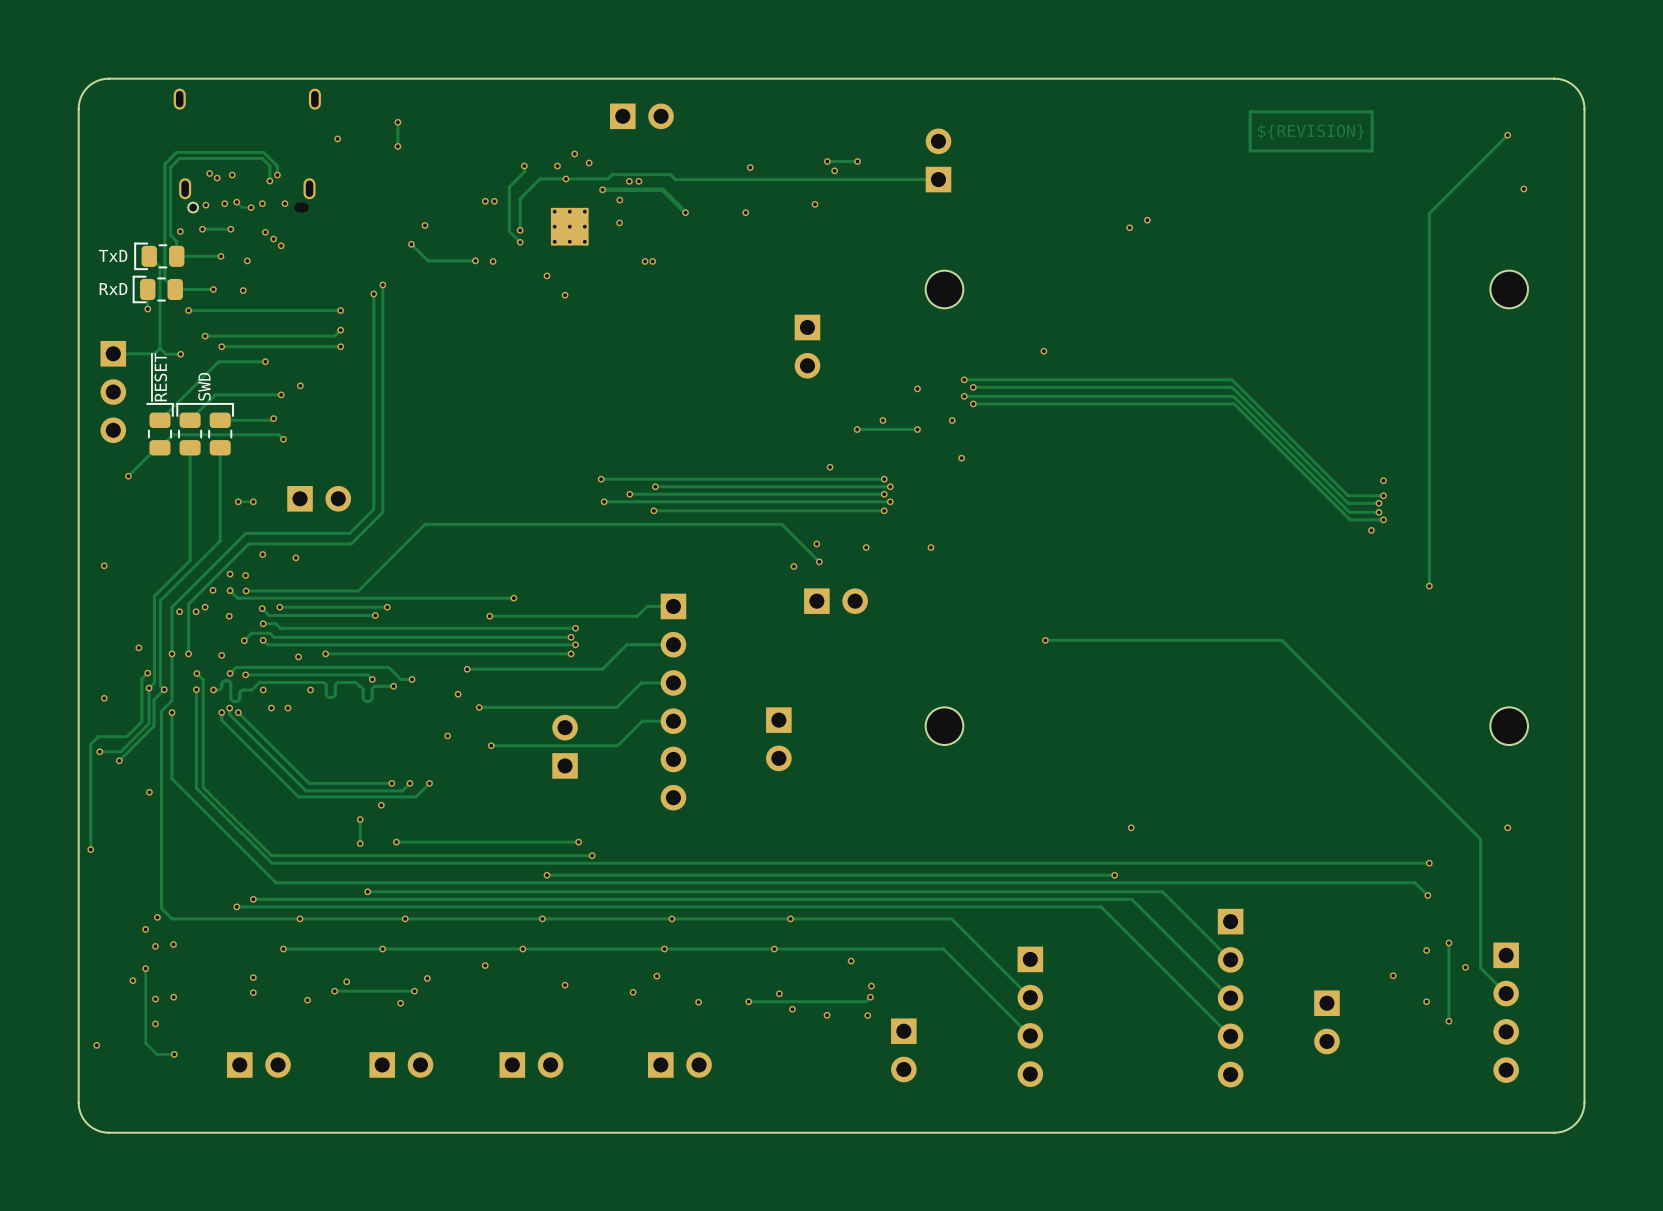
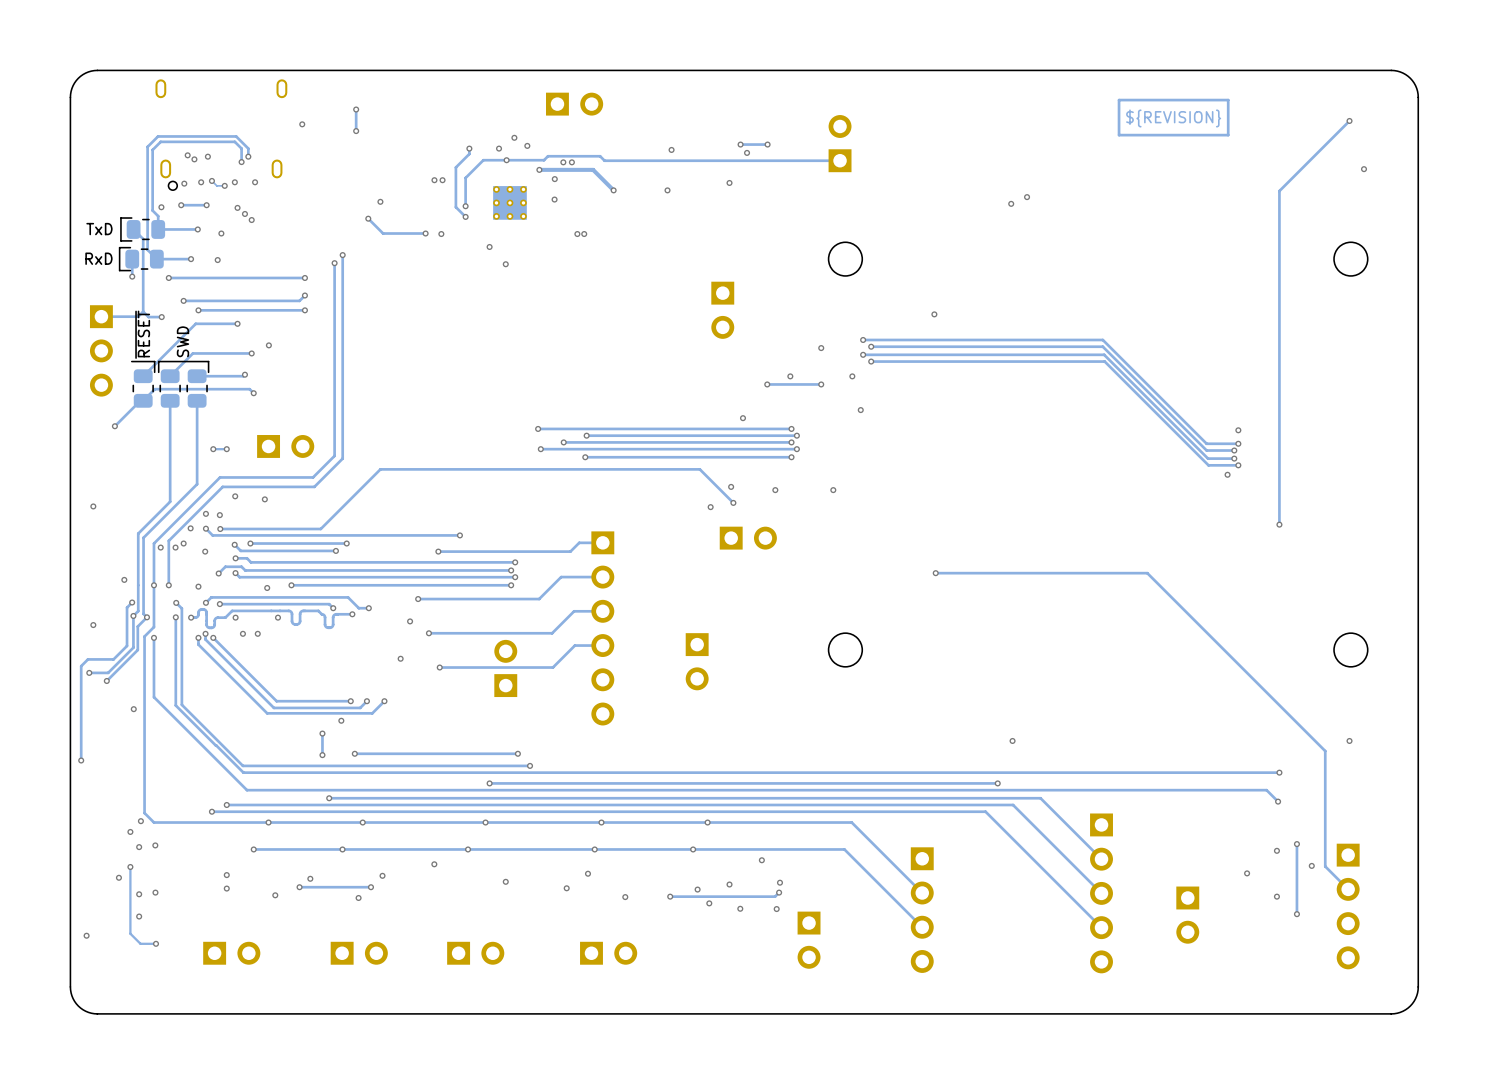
via: none -> (729, 884)

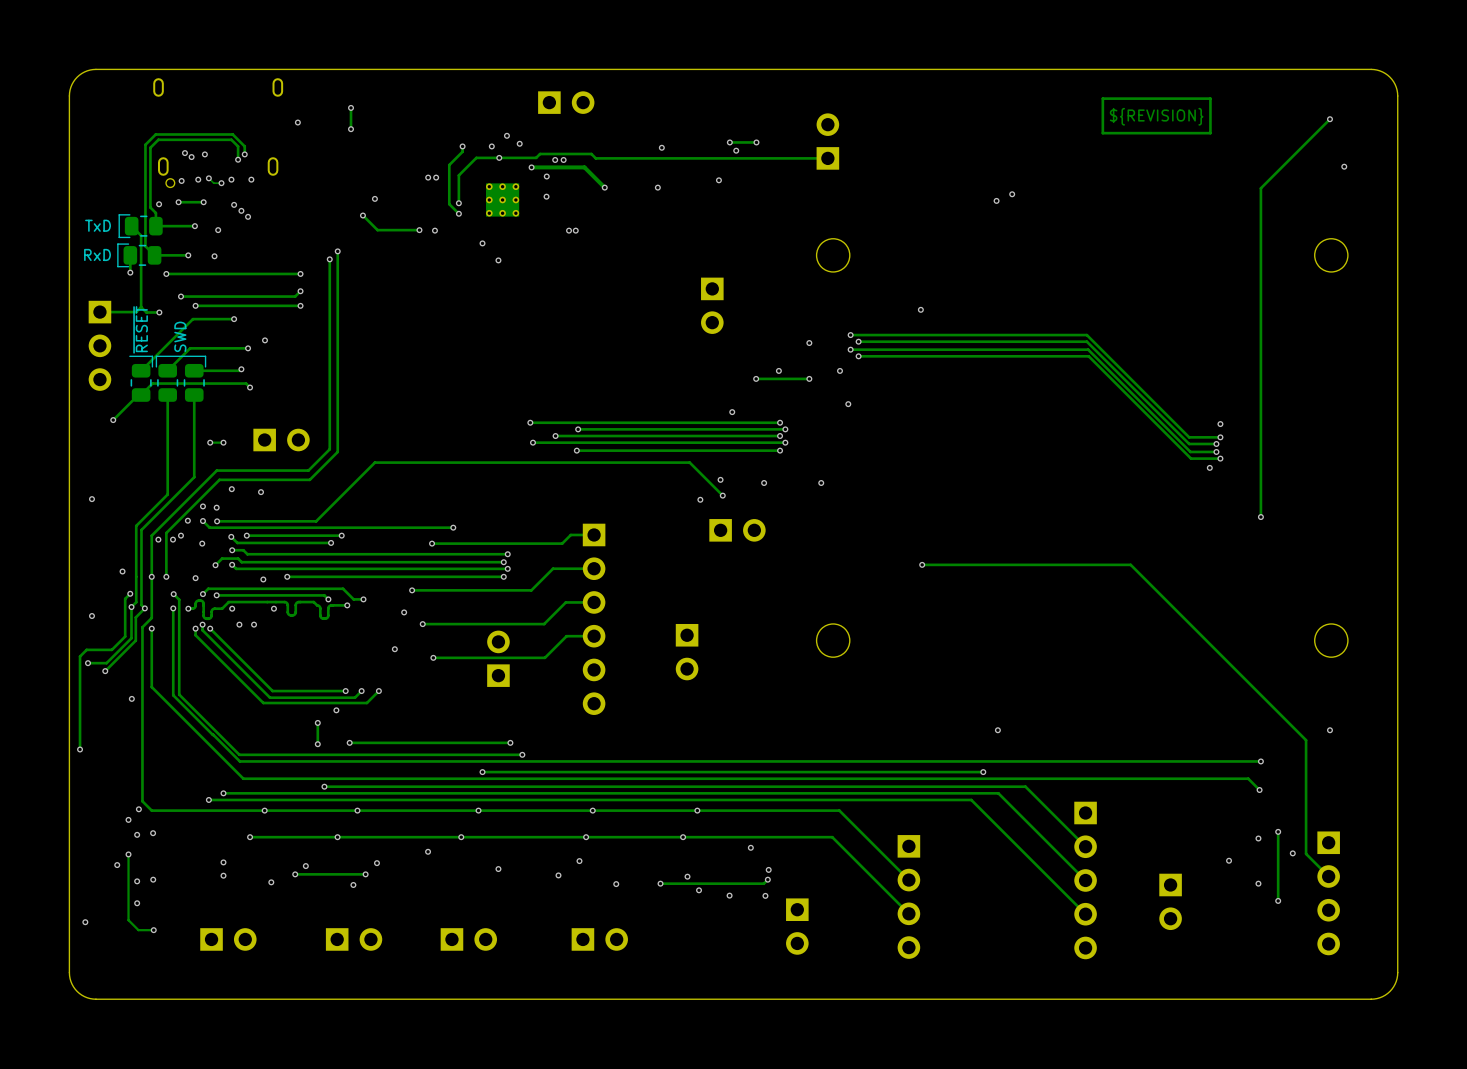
via: (729, 884) -> none

